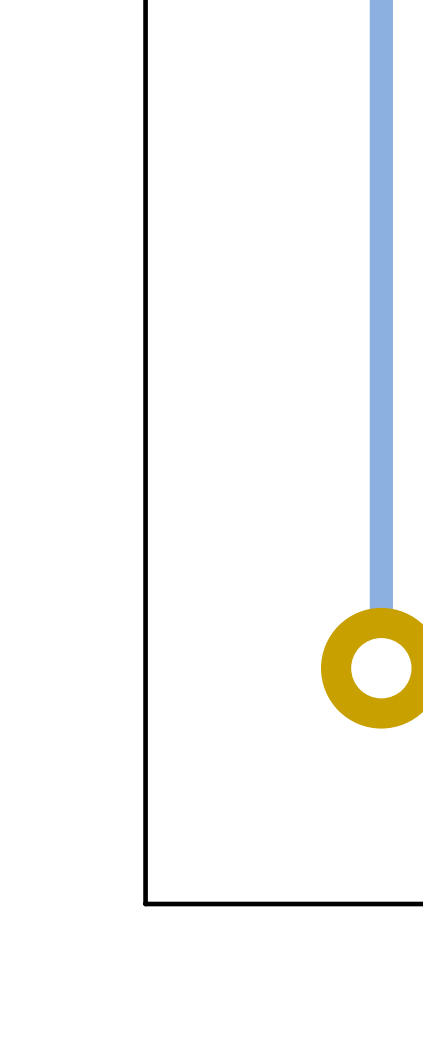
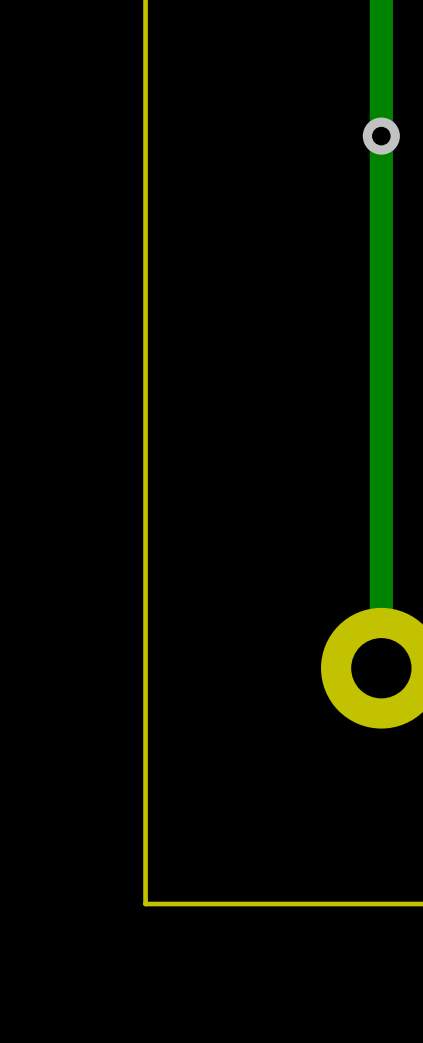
via: none -> (381, 136)

